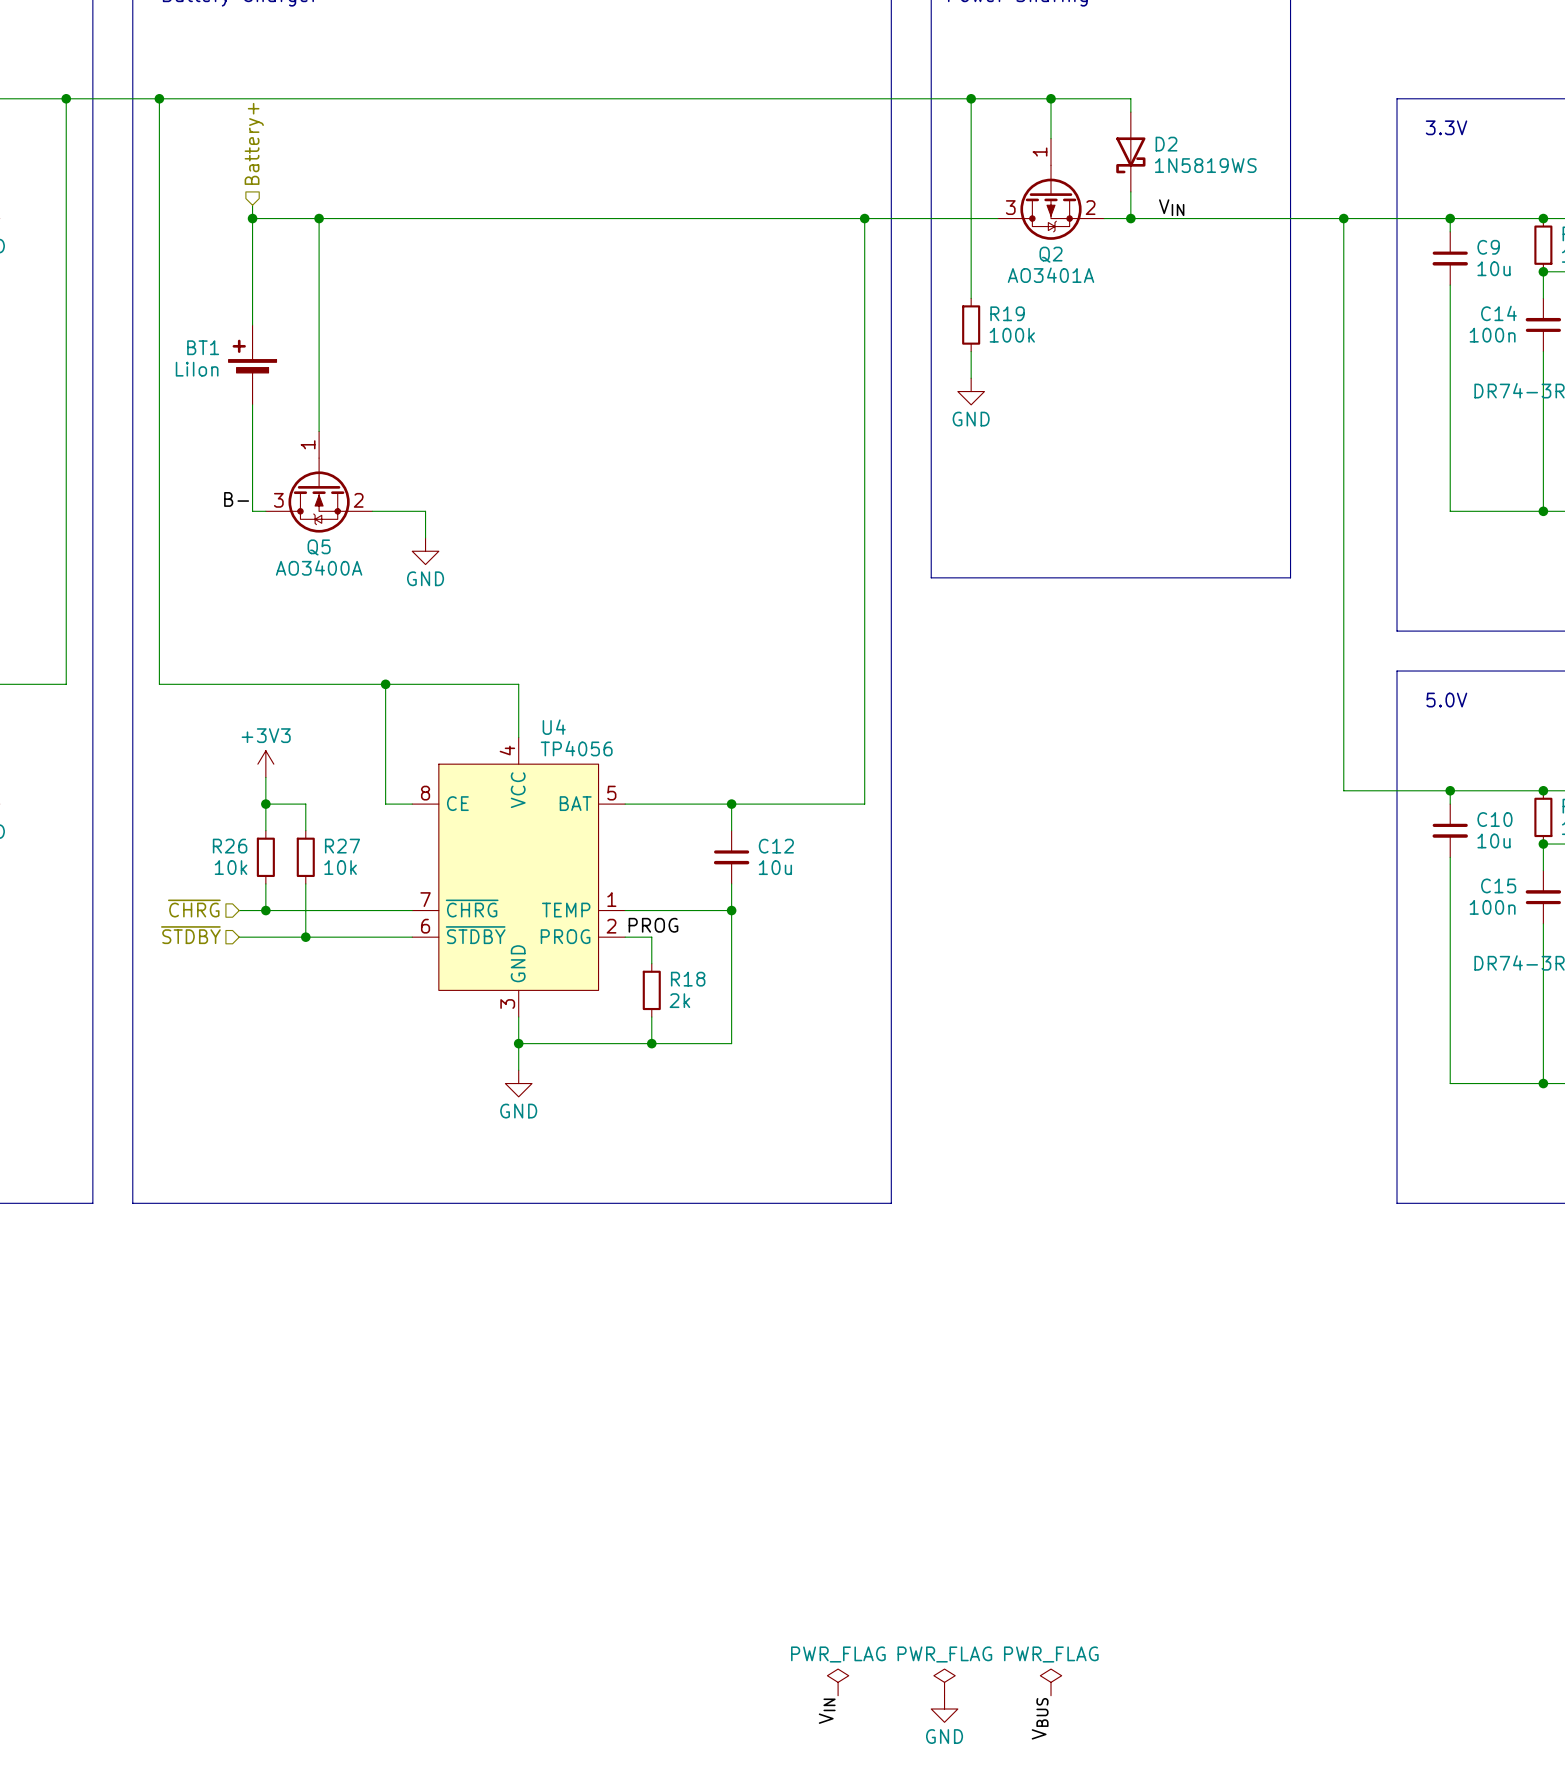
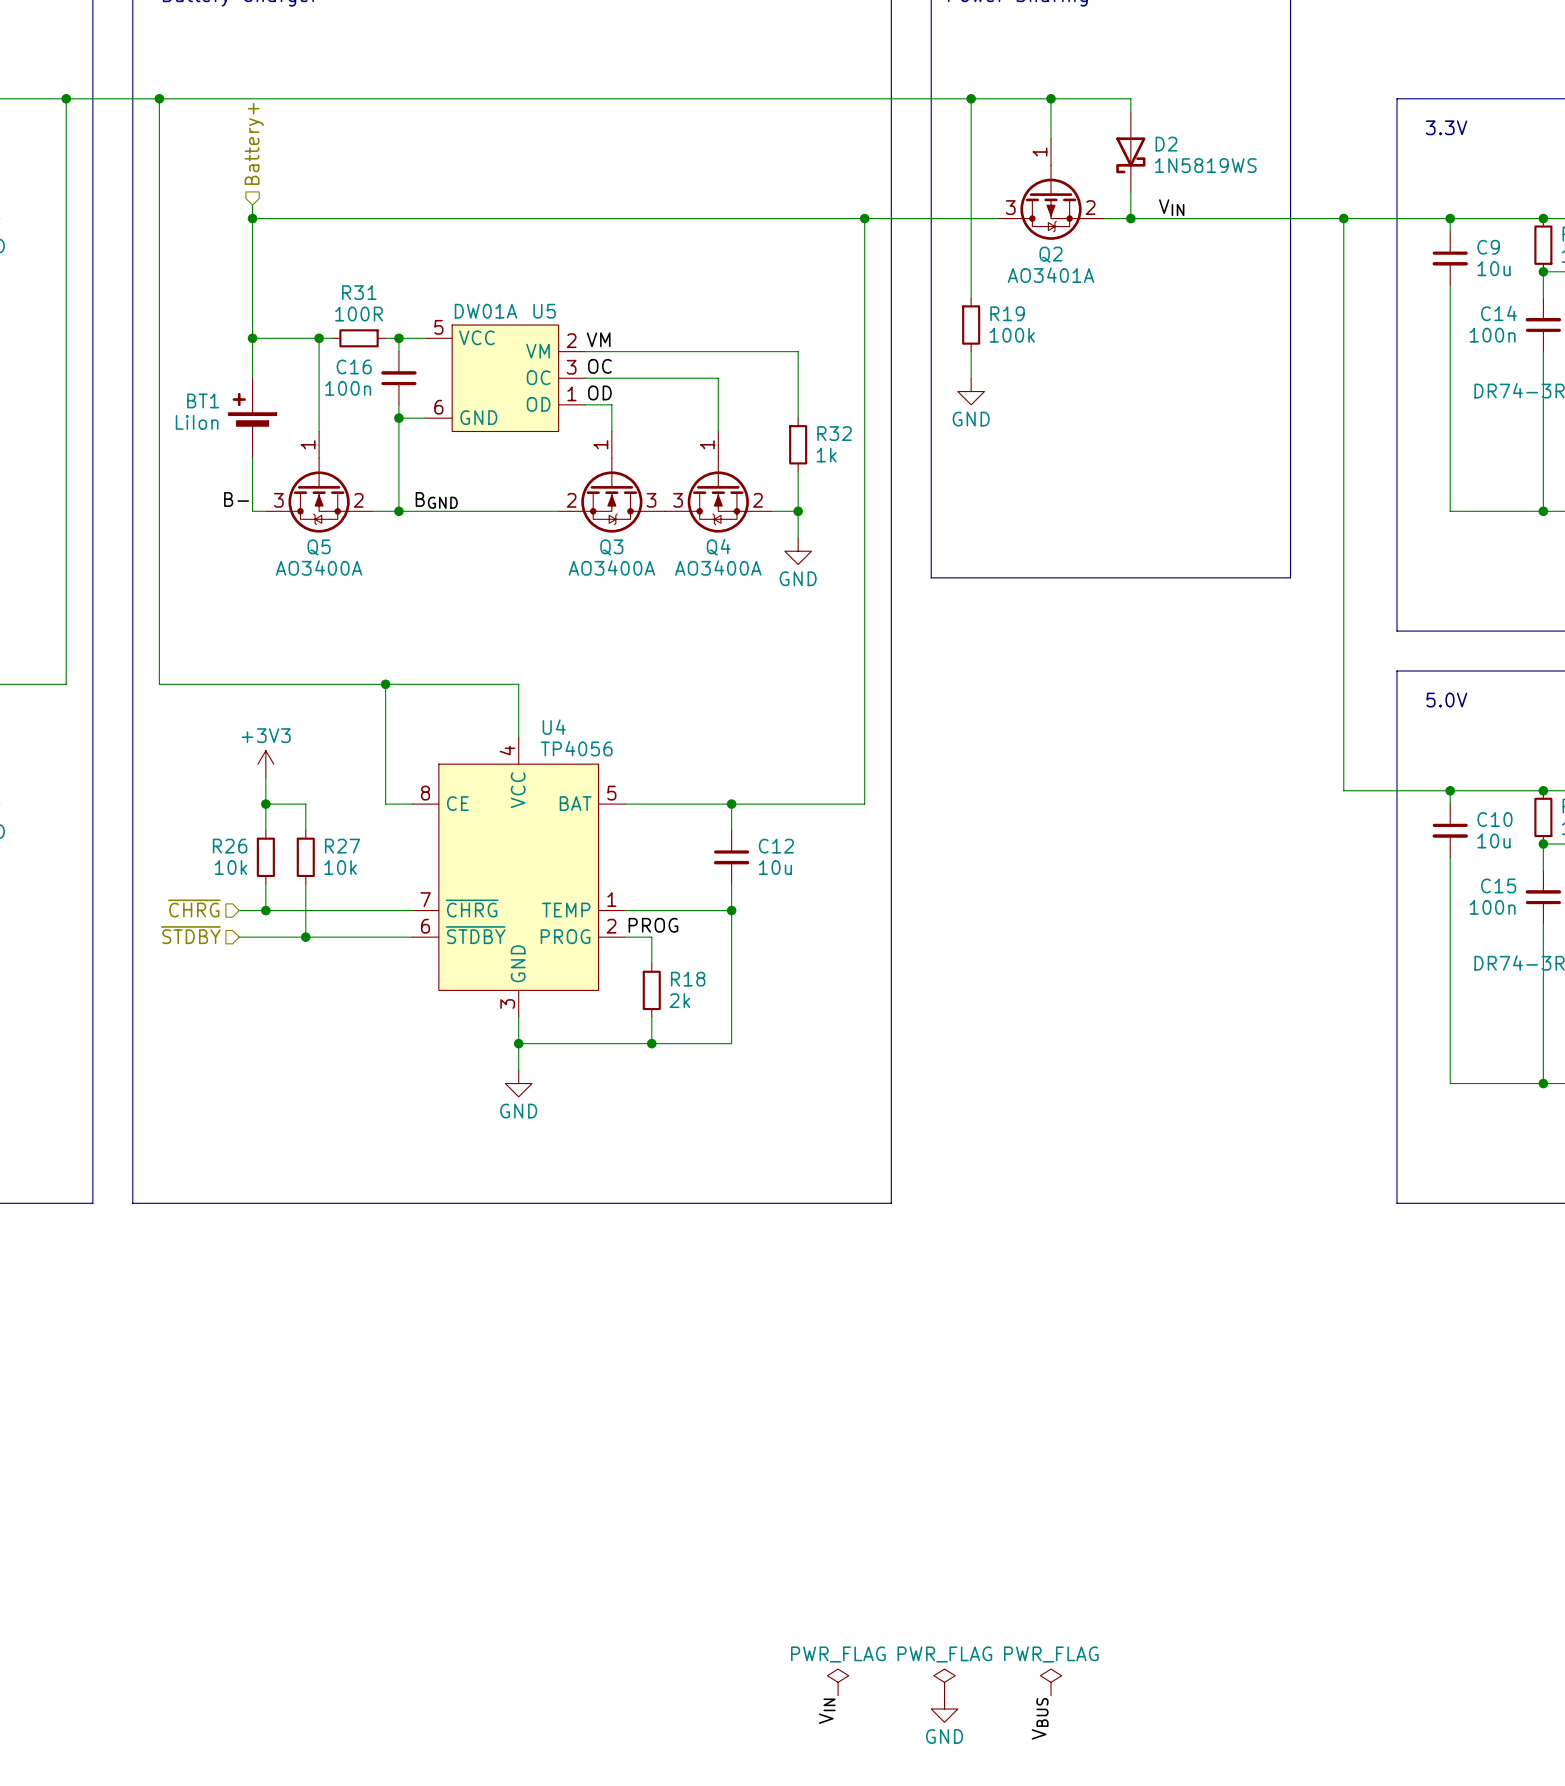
wire: (319, 218) (319, 338) -> none
junction: (319, 218) -> none
wire: none -> (252, 338) (332, 338)
junction: none -> (252, 338)
junction: none -> (319, 338)
R31: none -> 100R (359, 338)
wire: none -> (385, 338) (425, 338)
wire: none -> (398, 338) (398, 351)
junction: none -> (398, 338)
label: none -> VM (598, 339)
wire: none -> (585, 351) (798, 351) (798, 418)
BT1 position: (252, 364) -> (252, 418)
label: none -> OC (599, 366)
C16: none -> 100n (398, 378)
U5: none -> DW01A (505, 378)
wire: none -> (585, 378) (718, 378) (718, 431)
label: none -> OD (599, 392)
wire: none -> (398, 404) (398, 511)
wire: none -> (585, 404) (611, 404) (611, 431)
wire: none -> (398, 418) (425, 418)
junction: none -> (398, 418)
R32: none -> 1k (798, 444)
wire: none -> (798, 471) (798, 537)
Q3: none -> AO3400A (611, 482)
Q4: none -> AO3400A (718, 482)
label: none -> BGND (436, 500)
junction: none -> (398, 511)
wire: (425, 511) (425, 537) -> (425, 511) (558, 511)
wire: none -> (771, 511) (798, 511)
junction: none -> (798, 511)
power symbol: GND (425, 551) -> none
power symbol: none -> GND (798, 551)

